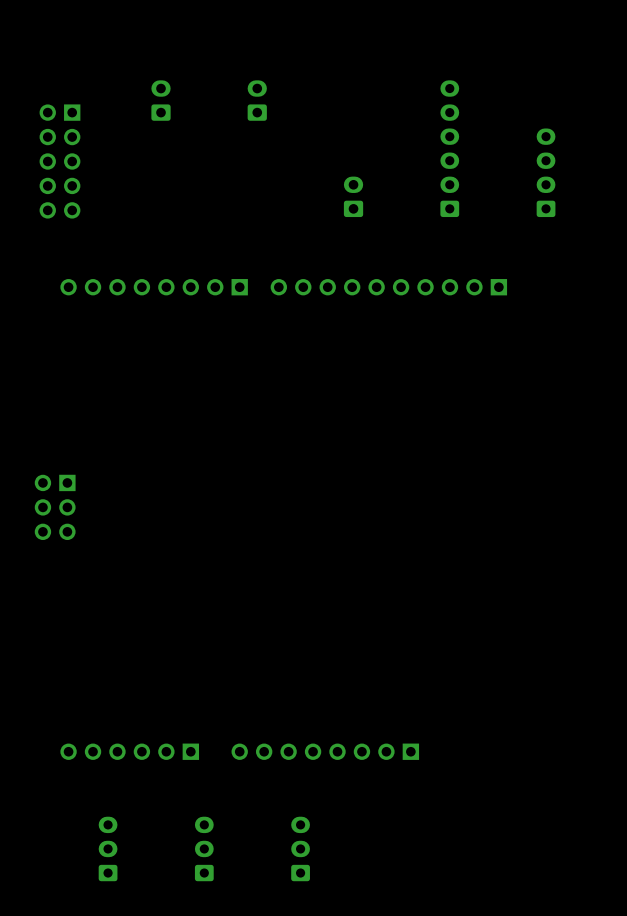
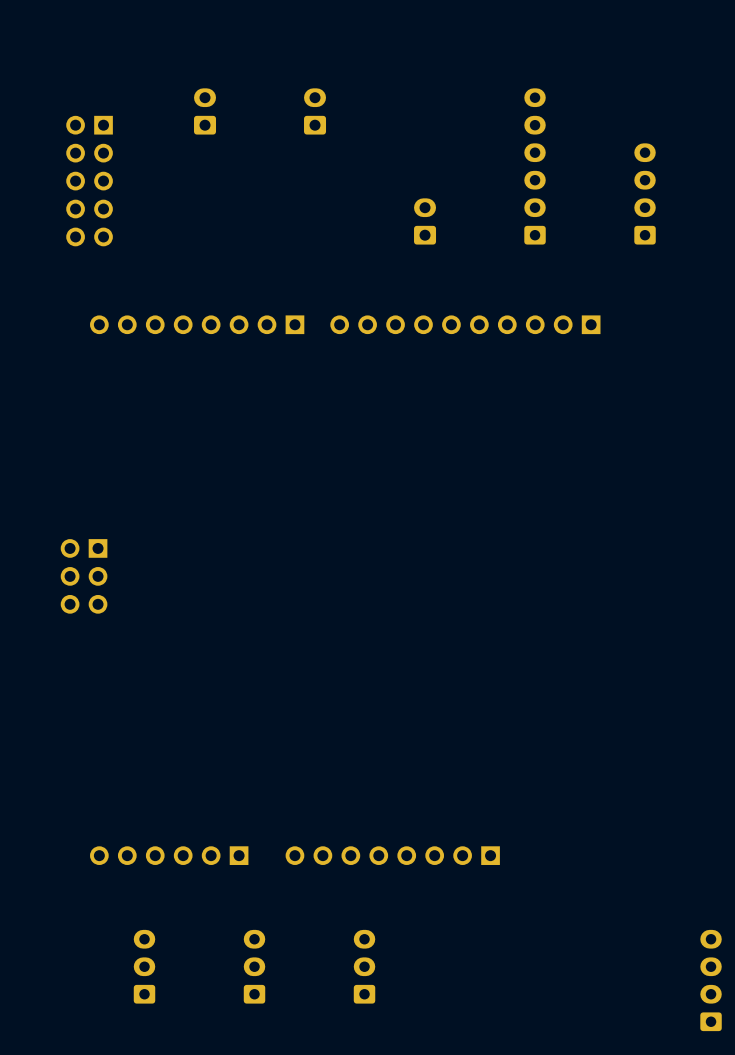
part: none -> (711, 980)

